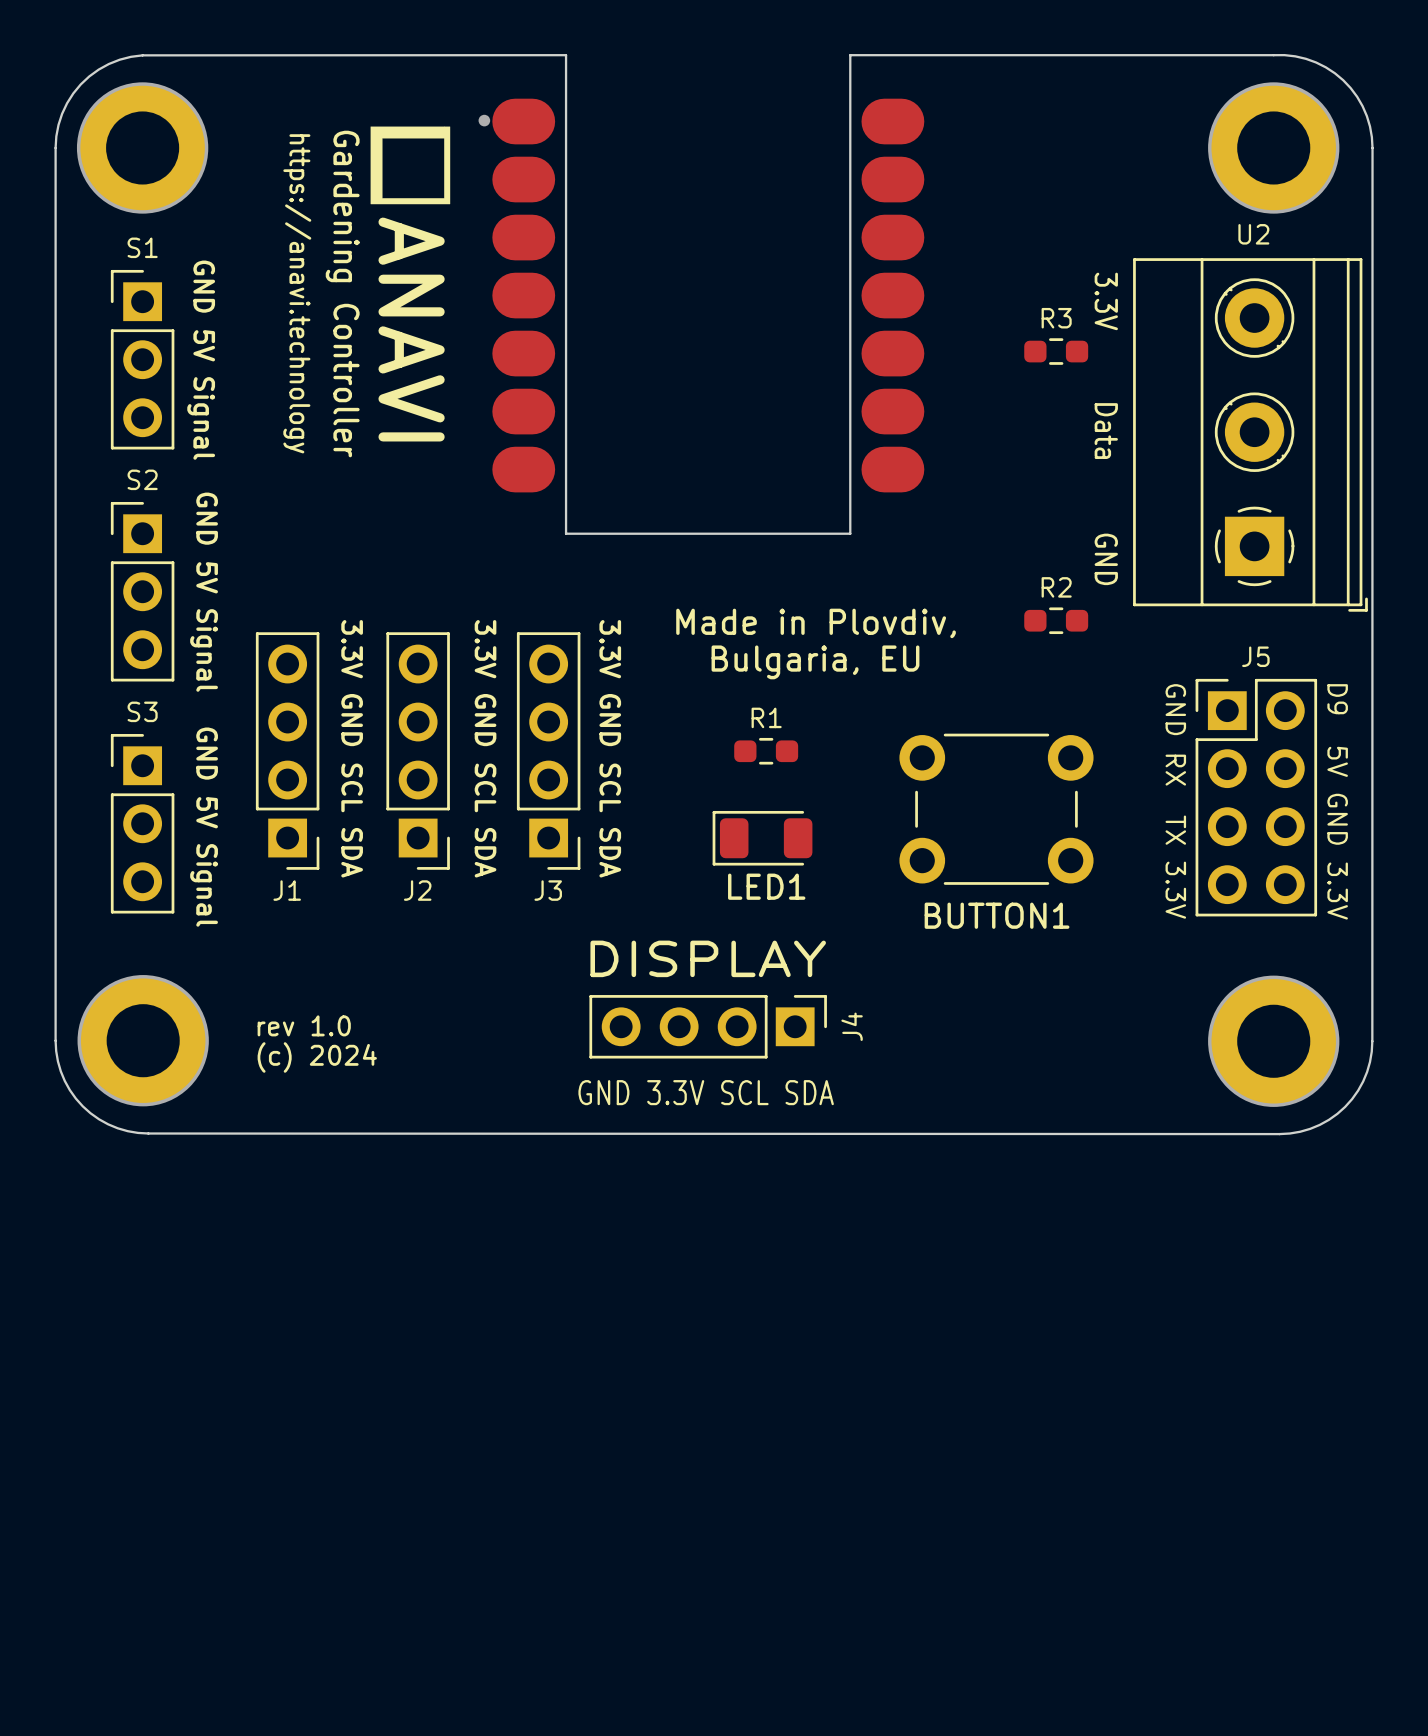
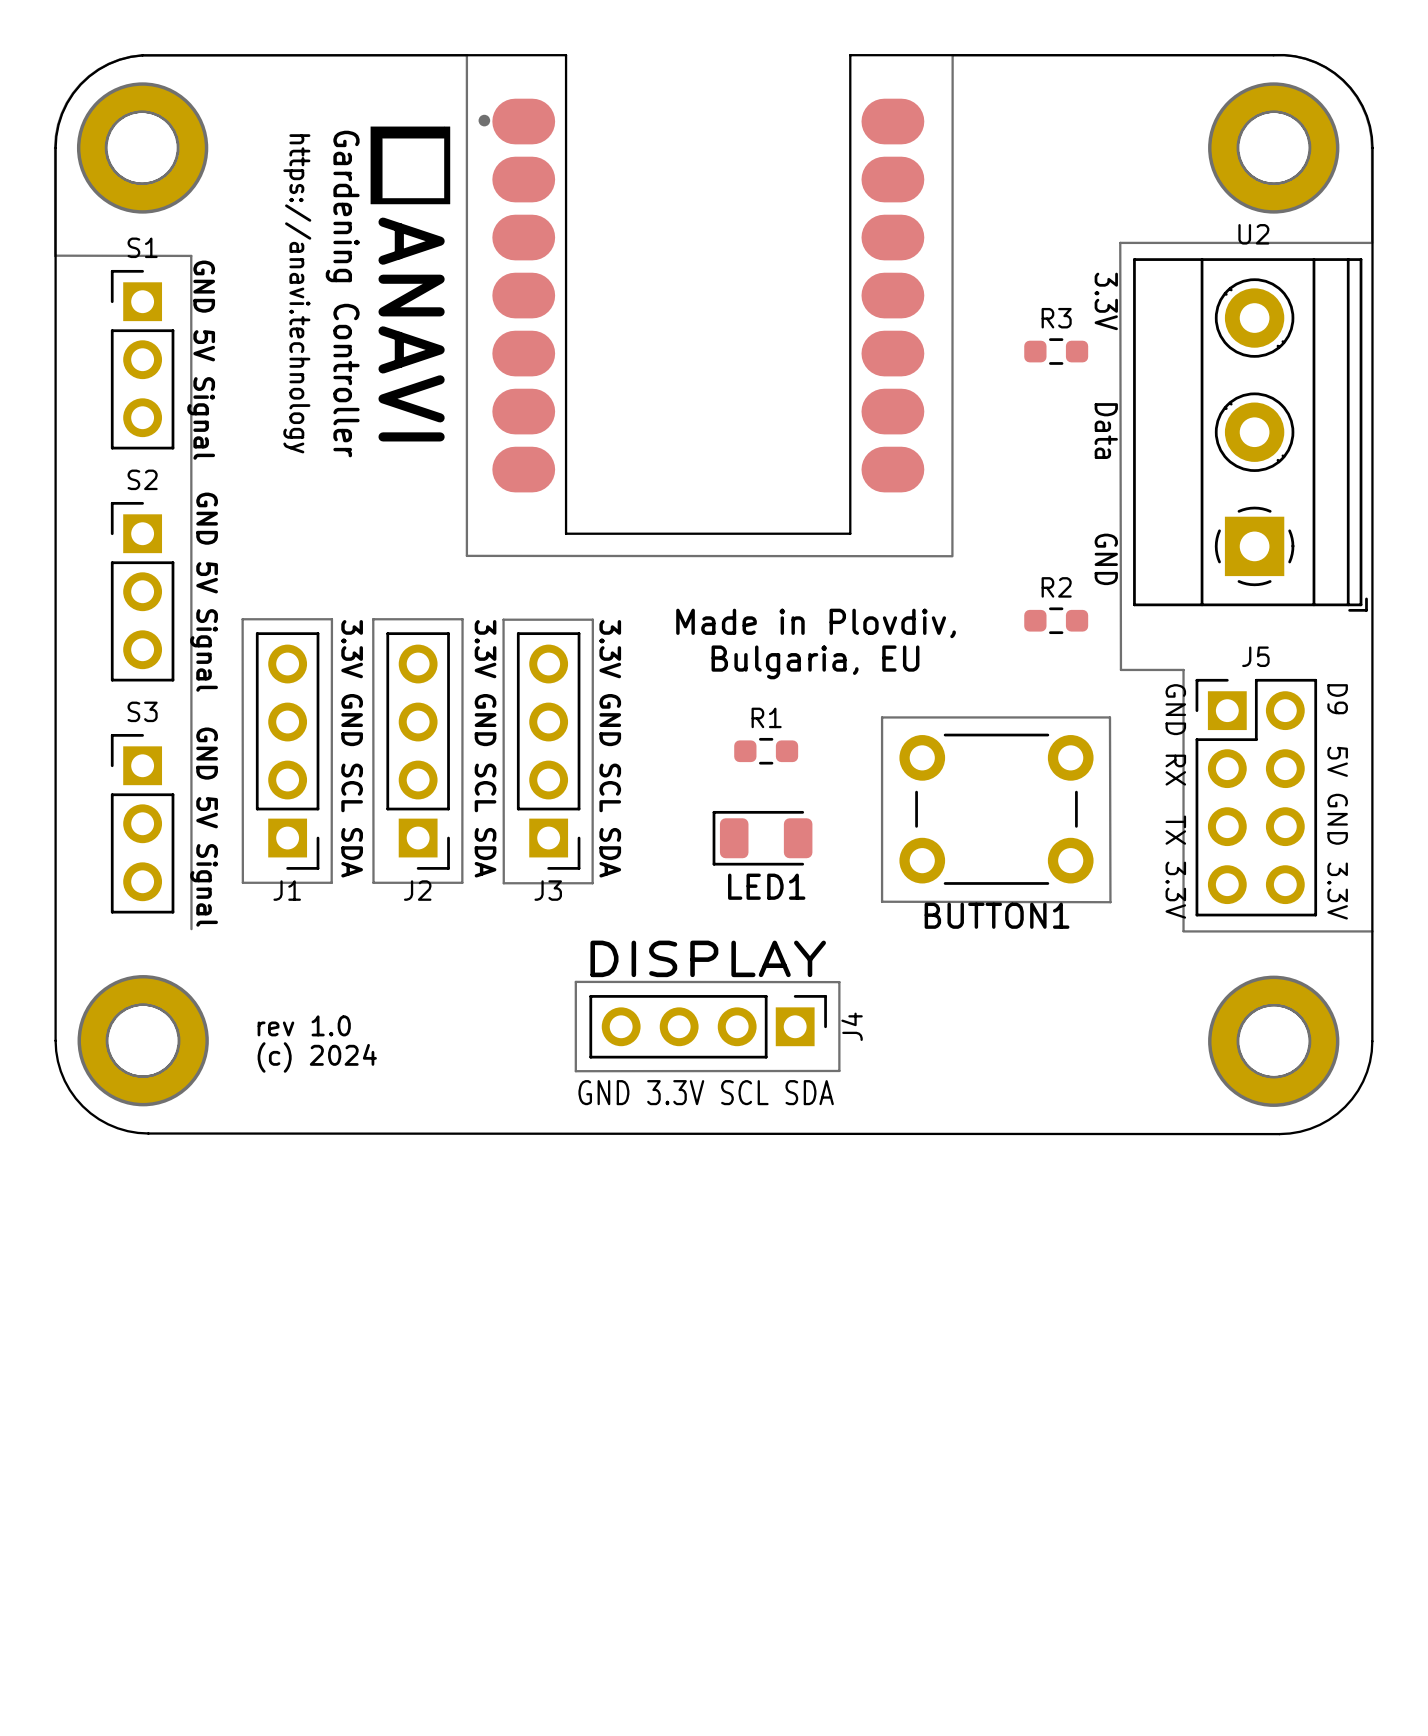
line: none -> (952, 55) (952, 556)
line: none -> (953, 55) (1294, 56) (1325, 67) (1342, 80) (1362, 106) (1369, 126) (1372, 147) (1372, 242) (1120, 242) (1120, 669) (1183, 669) (1183, 930)
drawing: none -> [104, 110, 180, 185]
drawing: none -> [1236, 110, 1312, 185]
line: none -> (951, 556) (466, 555) (466, 55) (142, 55) (108, 63) (80, 84) (66, 103) (58, 124) (55, 147) (55, 255) (191, 255) (191, 929)
line: none -> (242, 619) (331, 619) (331, 882) (242, 882) (242, 619)
line: none -> (373, 619) (462, 619) (462, 882) (373, 882) (373, 619)
line: none -> (503, 619) (592, 619) (592, 883) (503, 883) (503, 619)
line: none -> (1109, 717) (882, 717) (882, 901) (1110, 902) (1109, 717)
line: none -> (1183, 931) (1372, 931)
line: none -> (575, 981) (839, 982) (839, 1070) (575, 1071) (575, 981)
drawing: none -> [105, 1003, 181, 1078]
drawing: none -> [1236, 1004, 1312, 1079]

